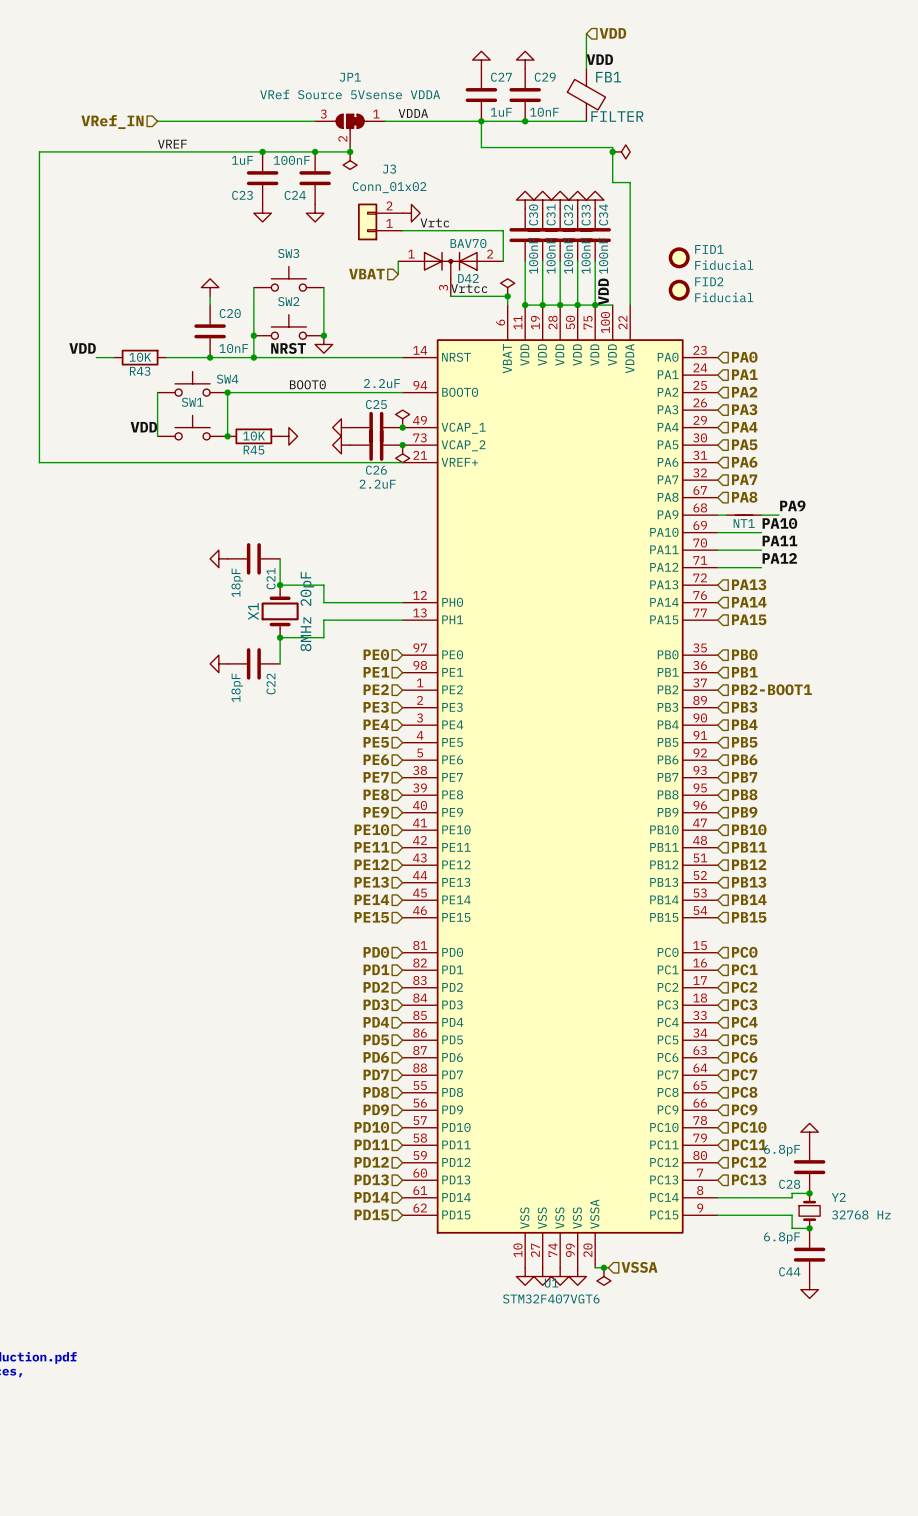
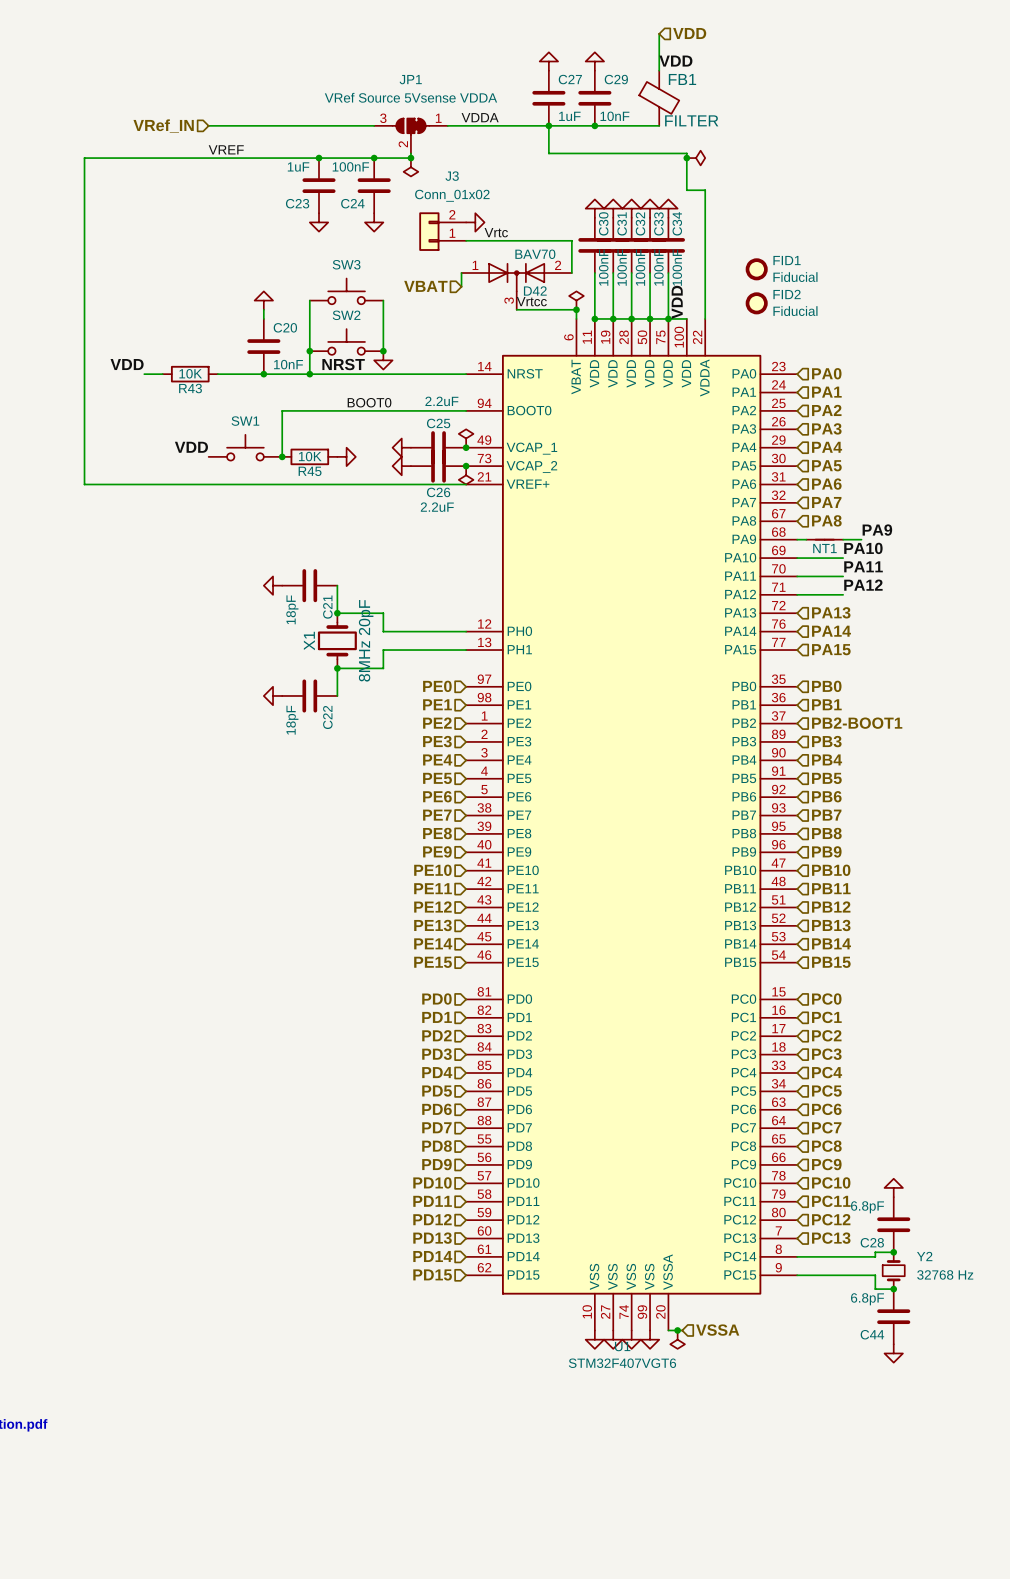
SW4: (192, 383) -> none
wire: (157, 392) (157, 436) -> none
junction: (227, 392) -> none

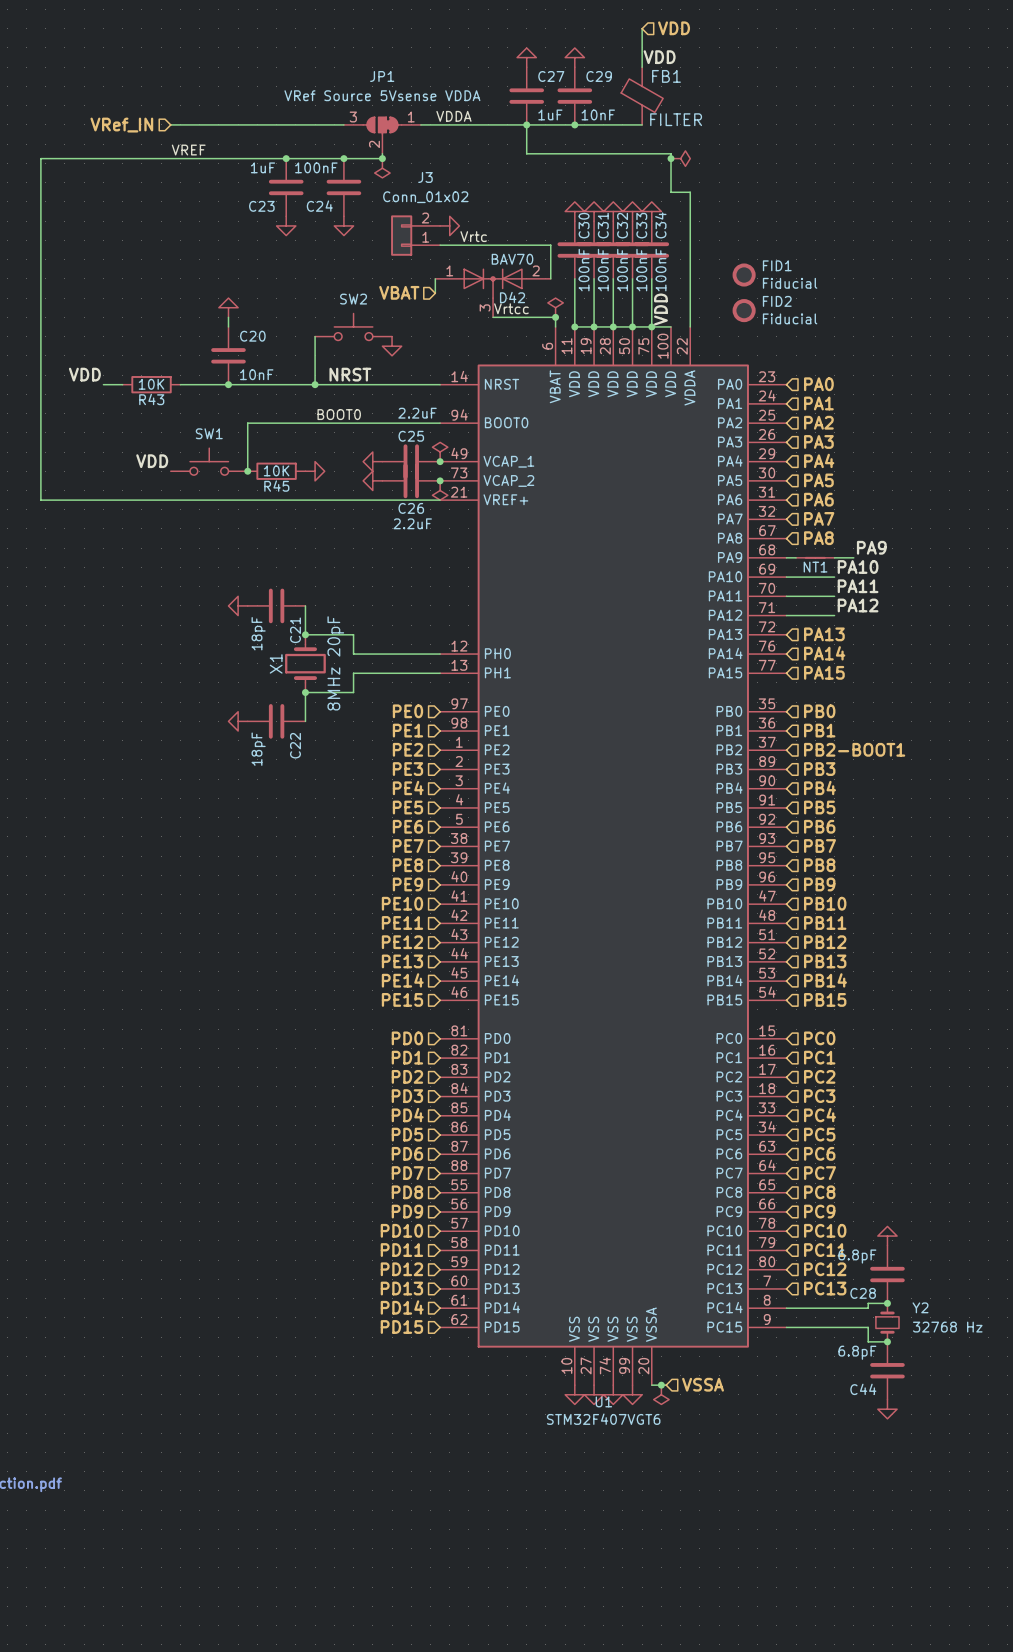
SW3: (346, 291) -> none
wire: (309, 300) (309, 374) -> none
wire: (383, 300) (383, 351) -> none
wire: none -> (315, 336) (315, 384)
SW2 position: (346, 341) -> (353, 326)
junction: (309, 351) -> none
junction: (383, 351) -> none
power symbol position: (383, 360) -> (392, 346)
label position: NRST (343, 364) -> NRST (350, 374)
junction: (309, 374) -> none
junction: none -> (315, 384)

